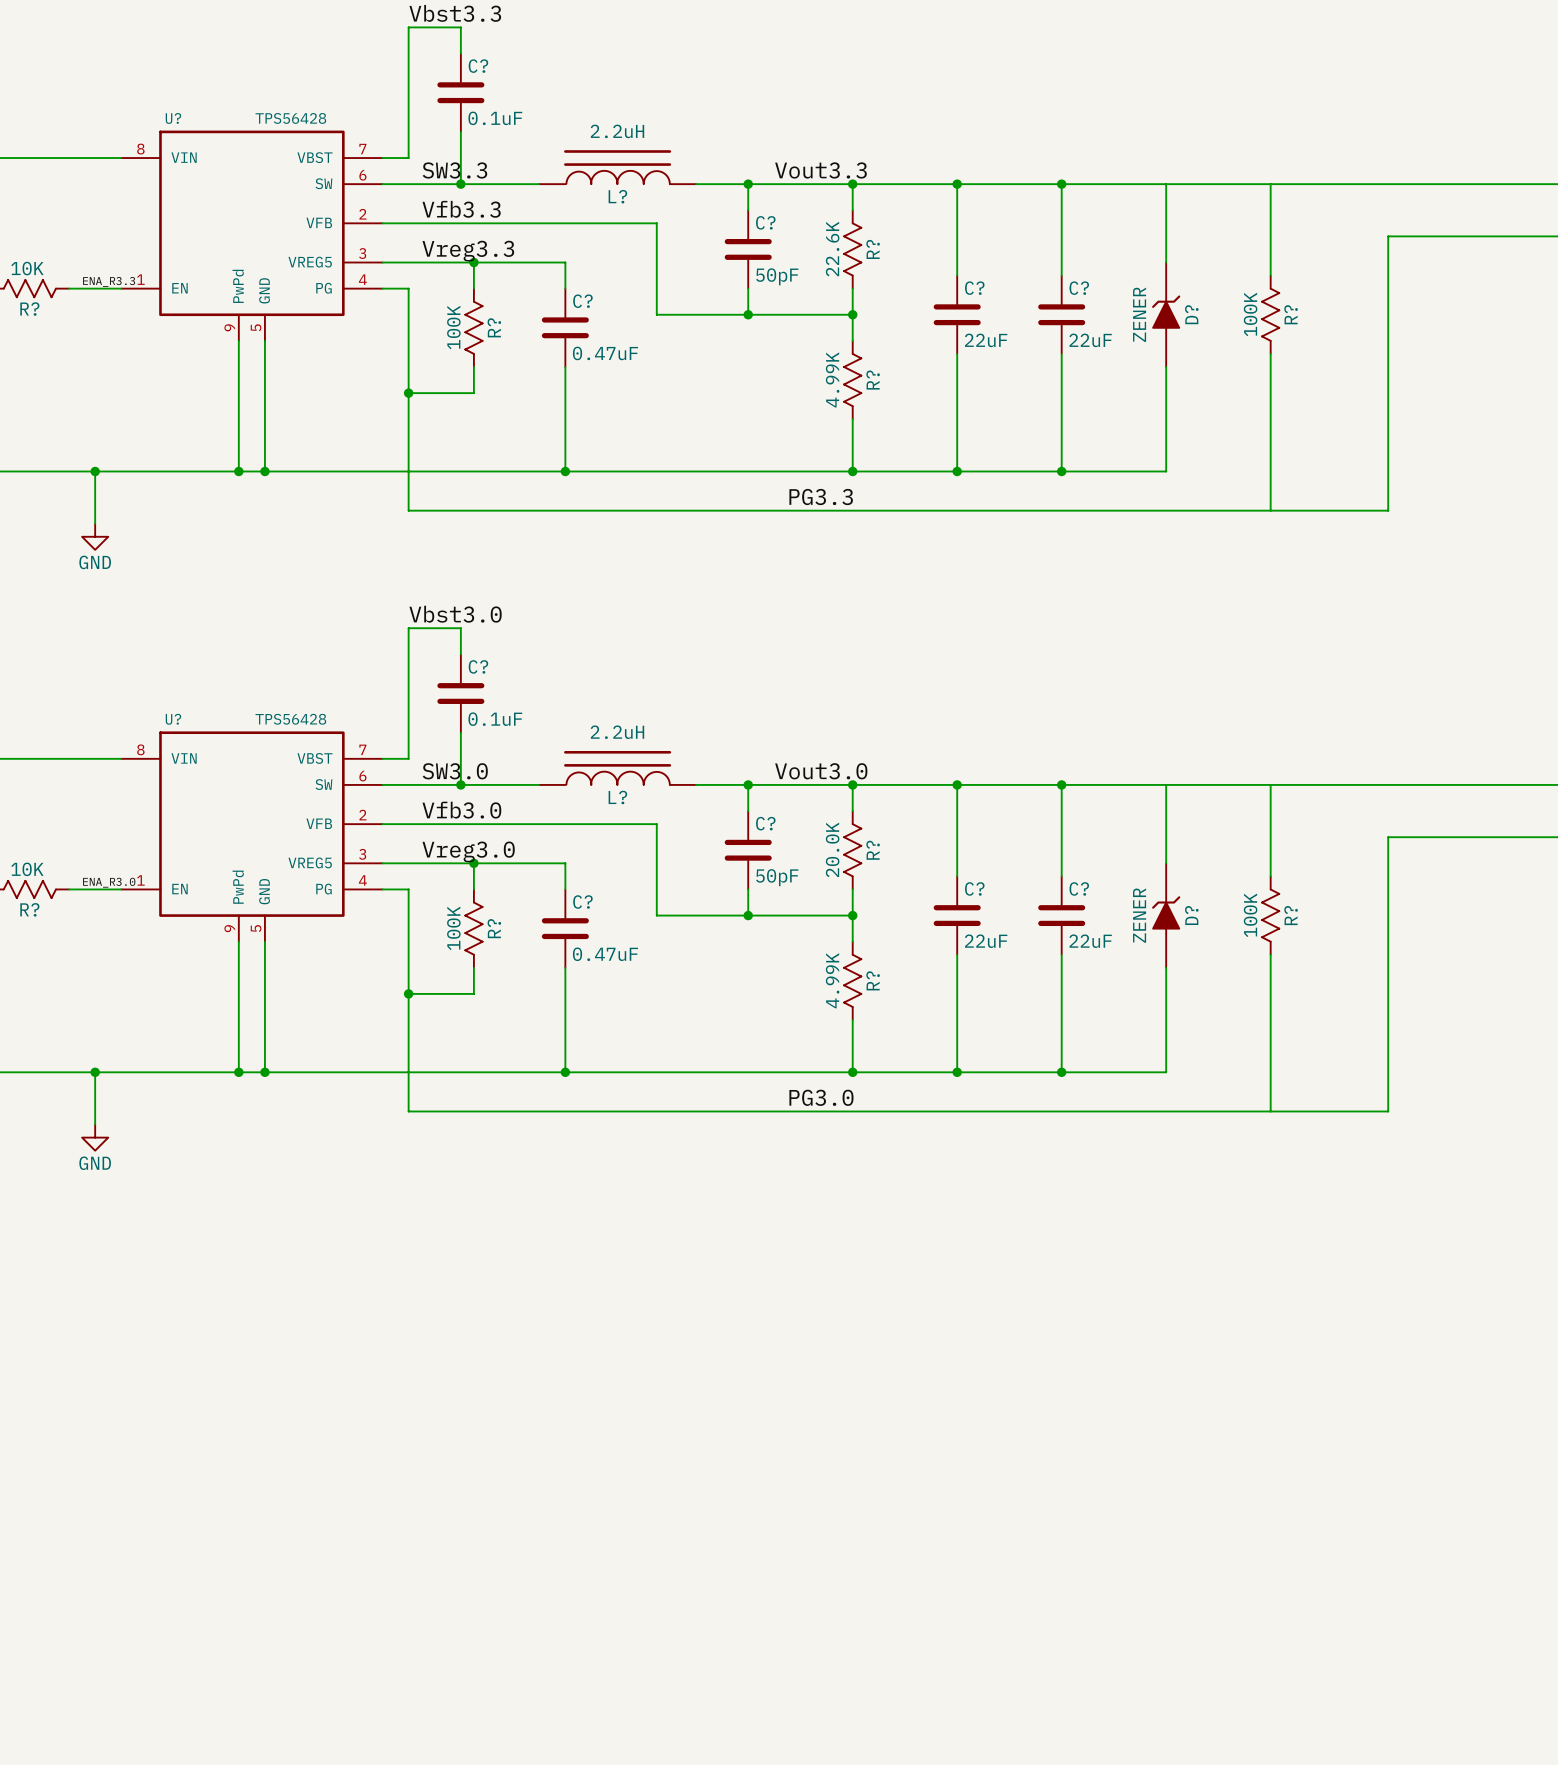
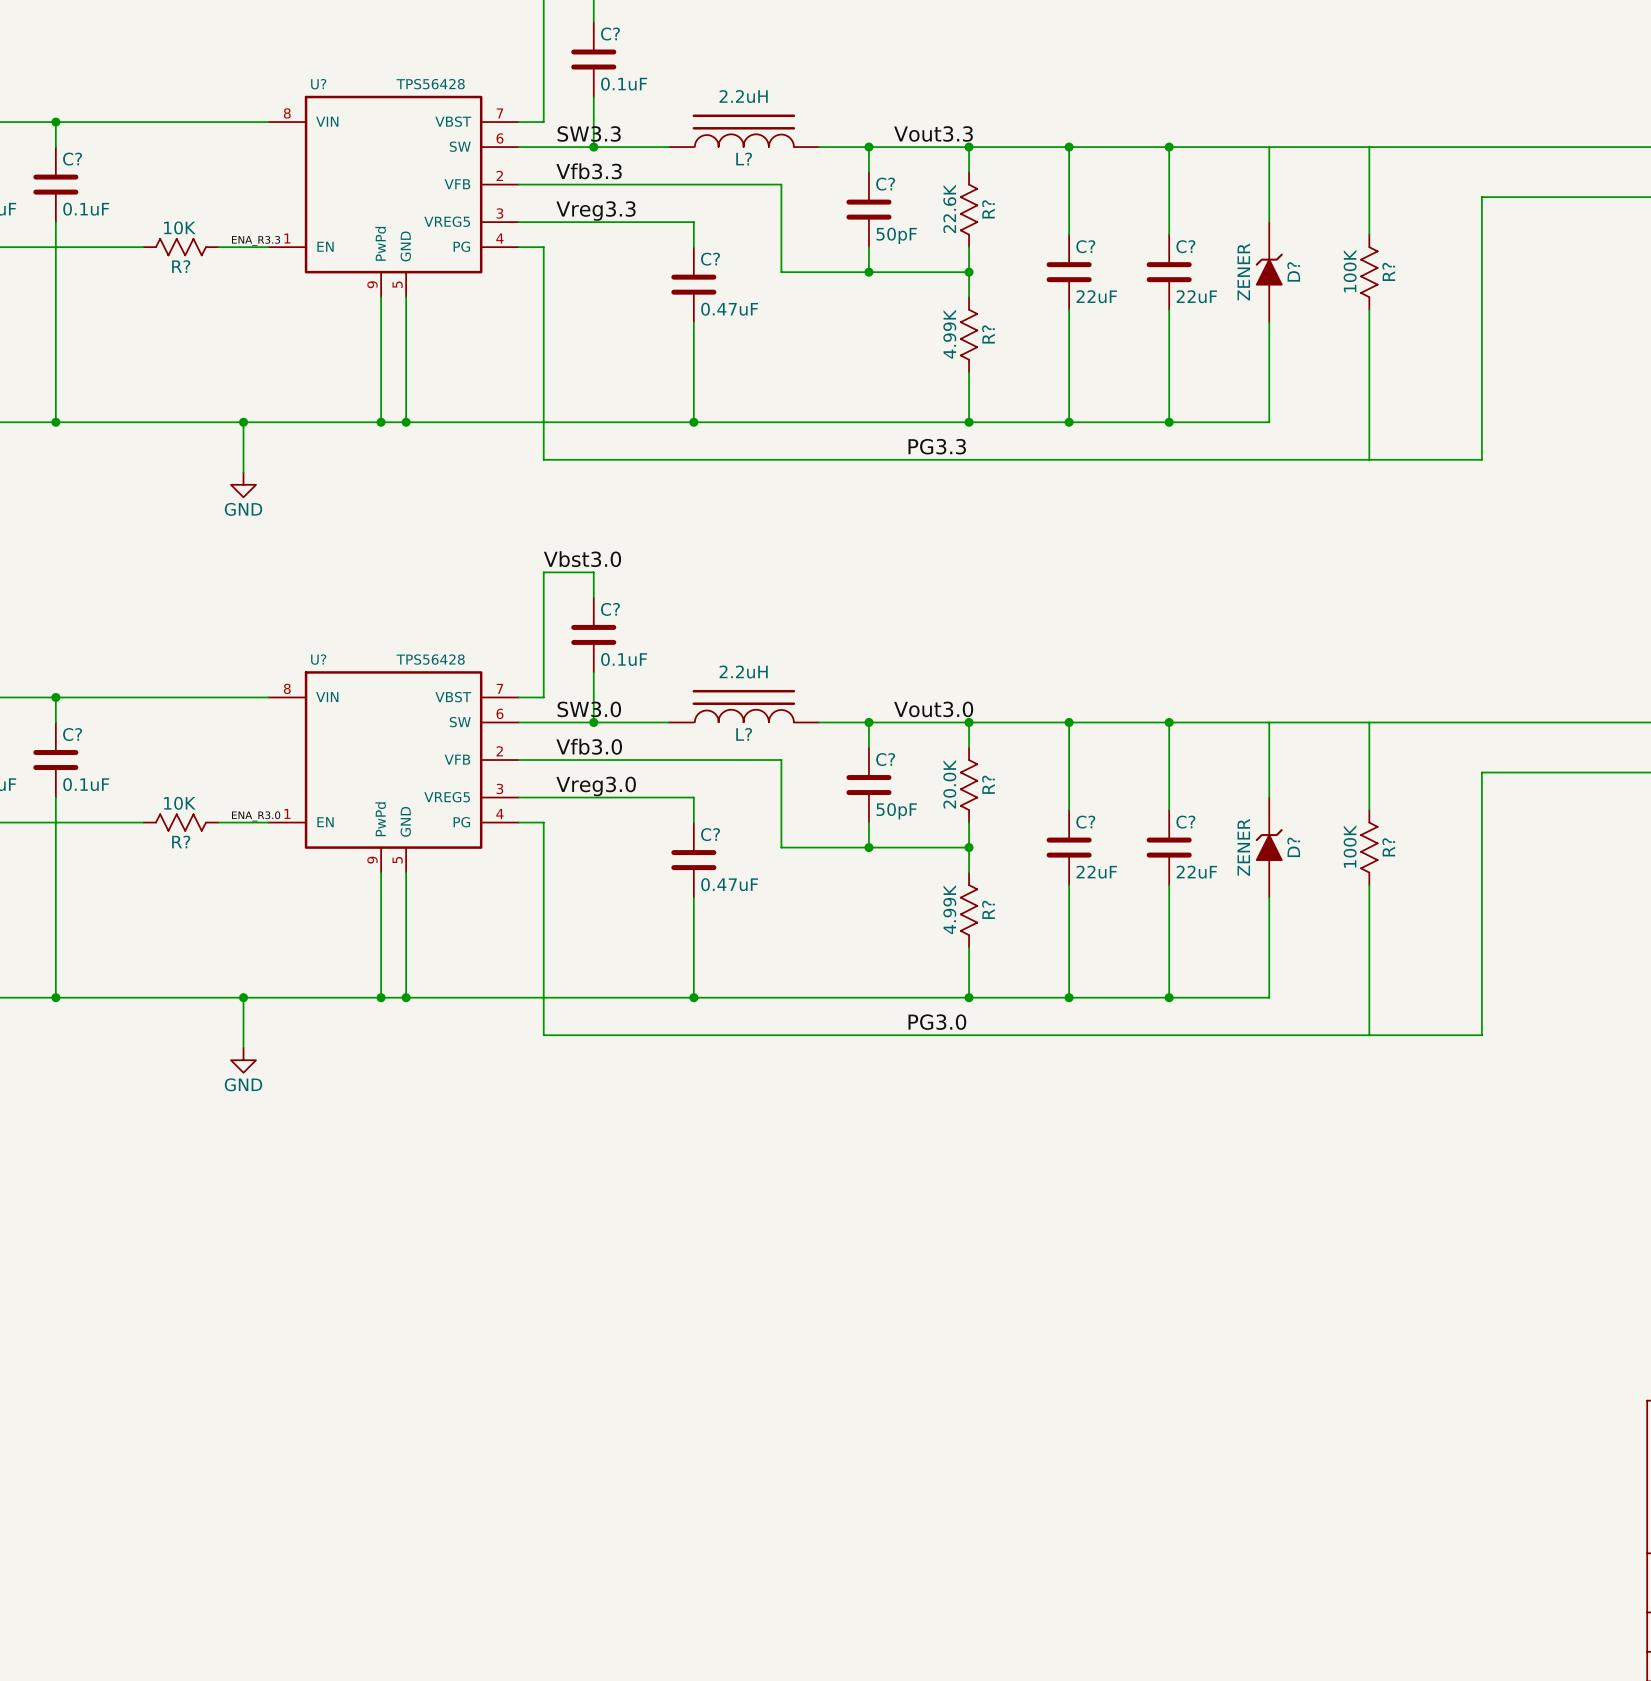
wire: (473, 262) (473, 288) -> none
junction: (473, 262) -> none
R?: 100K (473, 327) -> none
wire: (473, 367) (473, 393) (408, 393) -> none
junction: (408, 393) -> none
wire: (473, 863) (473, 889) -> none
junction: (473, 863) -> none
R?: 100K (473, 928) -> none
wire: (473, 967) (473, 993) (408, 993) -> none
junction: (408, 993) -> none

